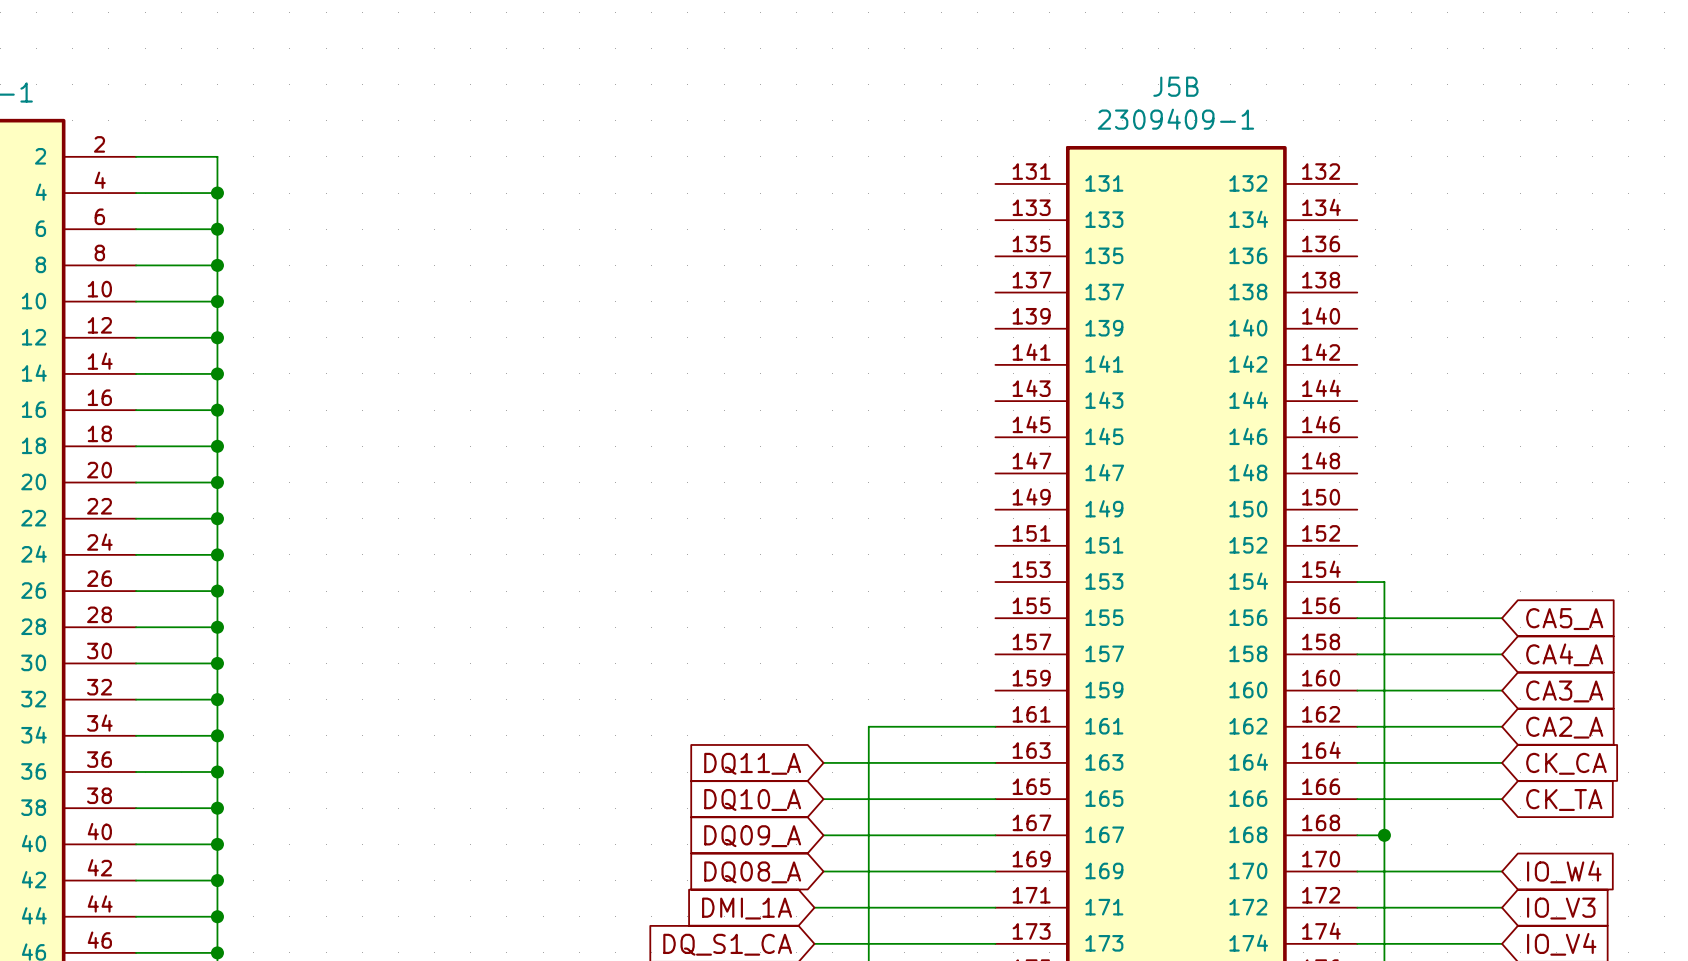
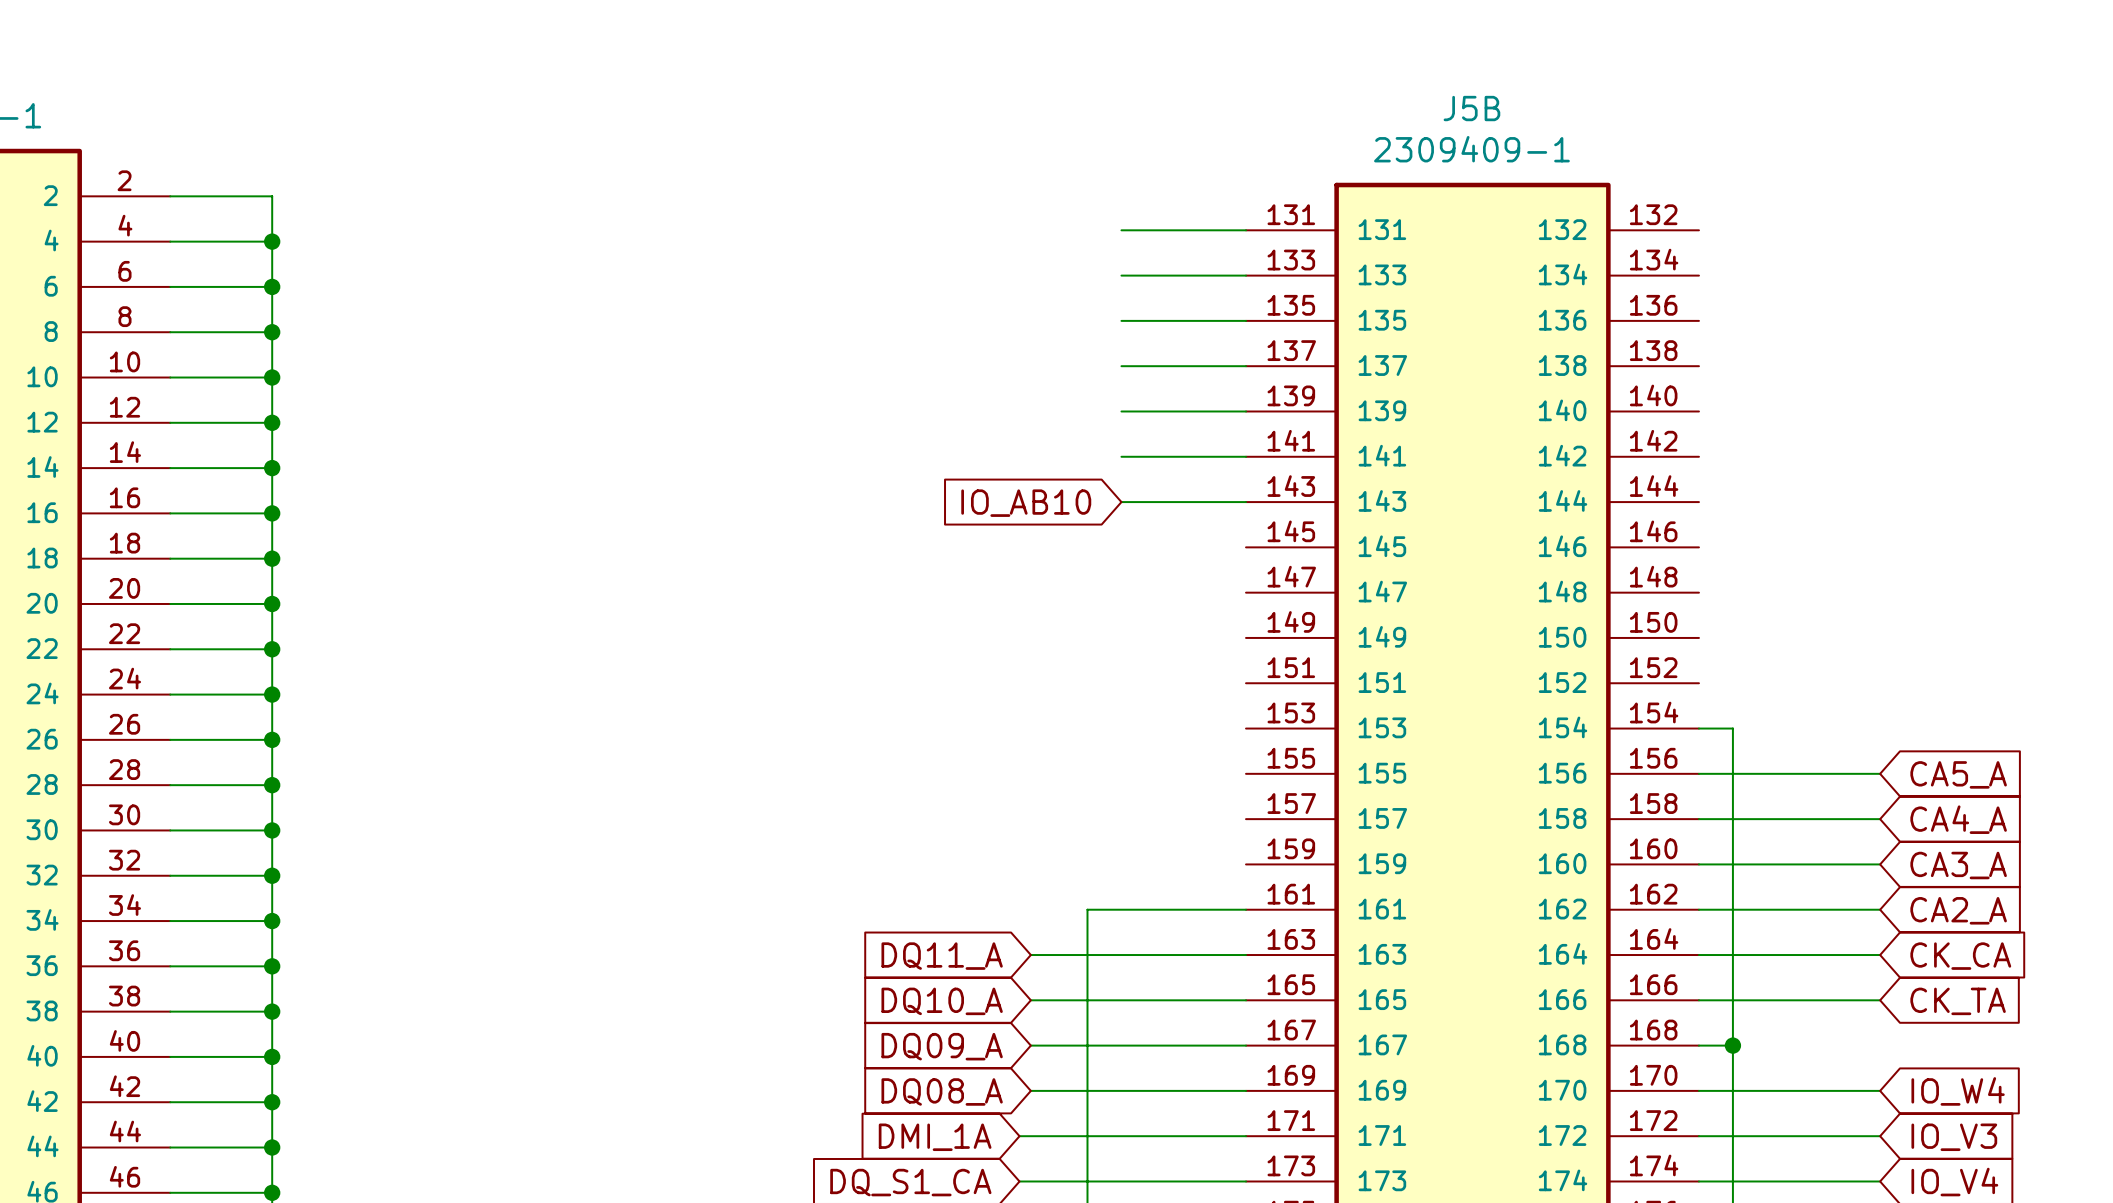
wire: none -> (1121, 230) (1246, 230)
wire: none -> (1121, 275) (1246, 275)
wire: none -> (1121, 320) (1246, 320)
wire: none -> (1121, 366) (1246, 366)
wire: none -> (1121, 411) (1246, 411)
wire: none -> (1121, 456) (1246, 456)
global label: none -> IO_AB10 (1026, 503)
wire: none -> (1121, 502) (1246, 502)

